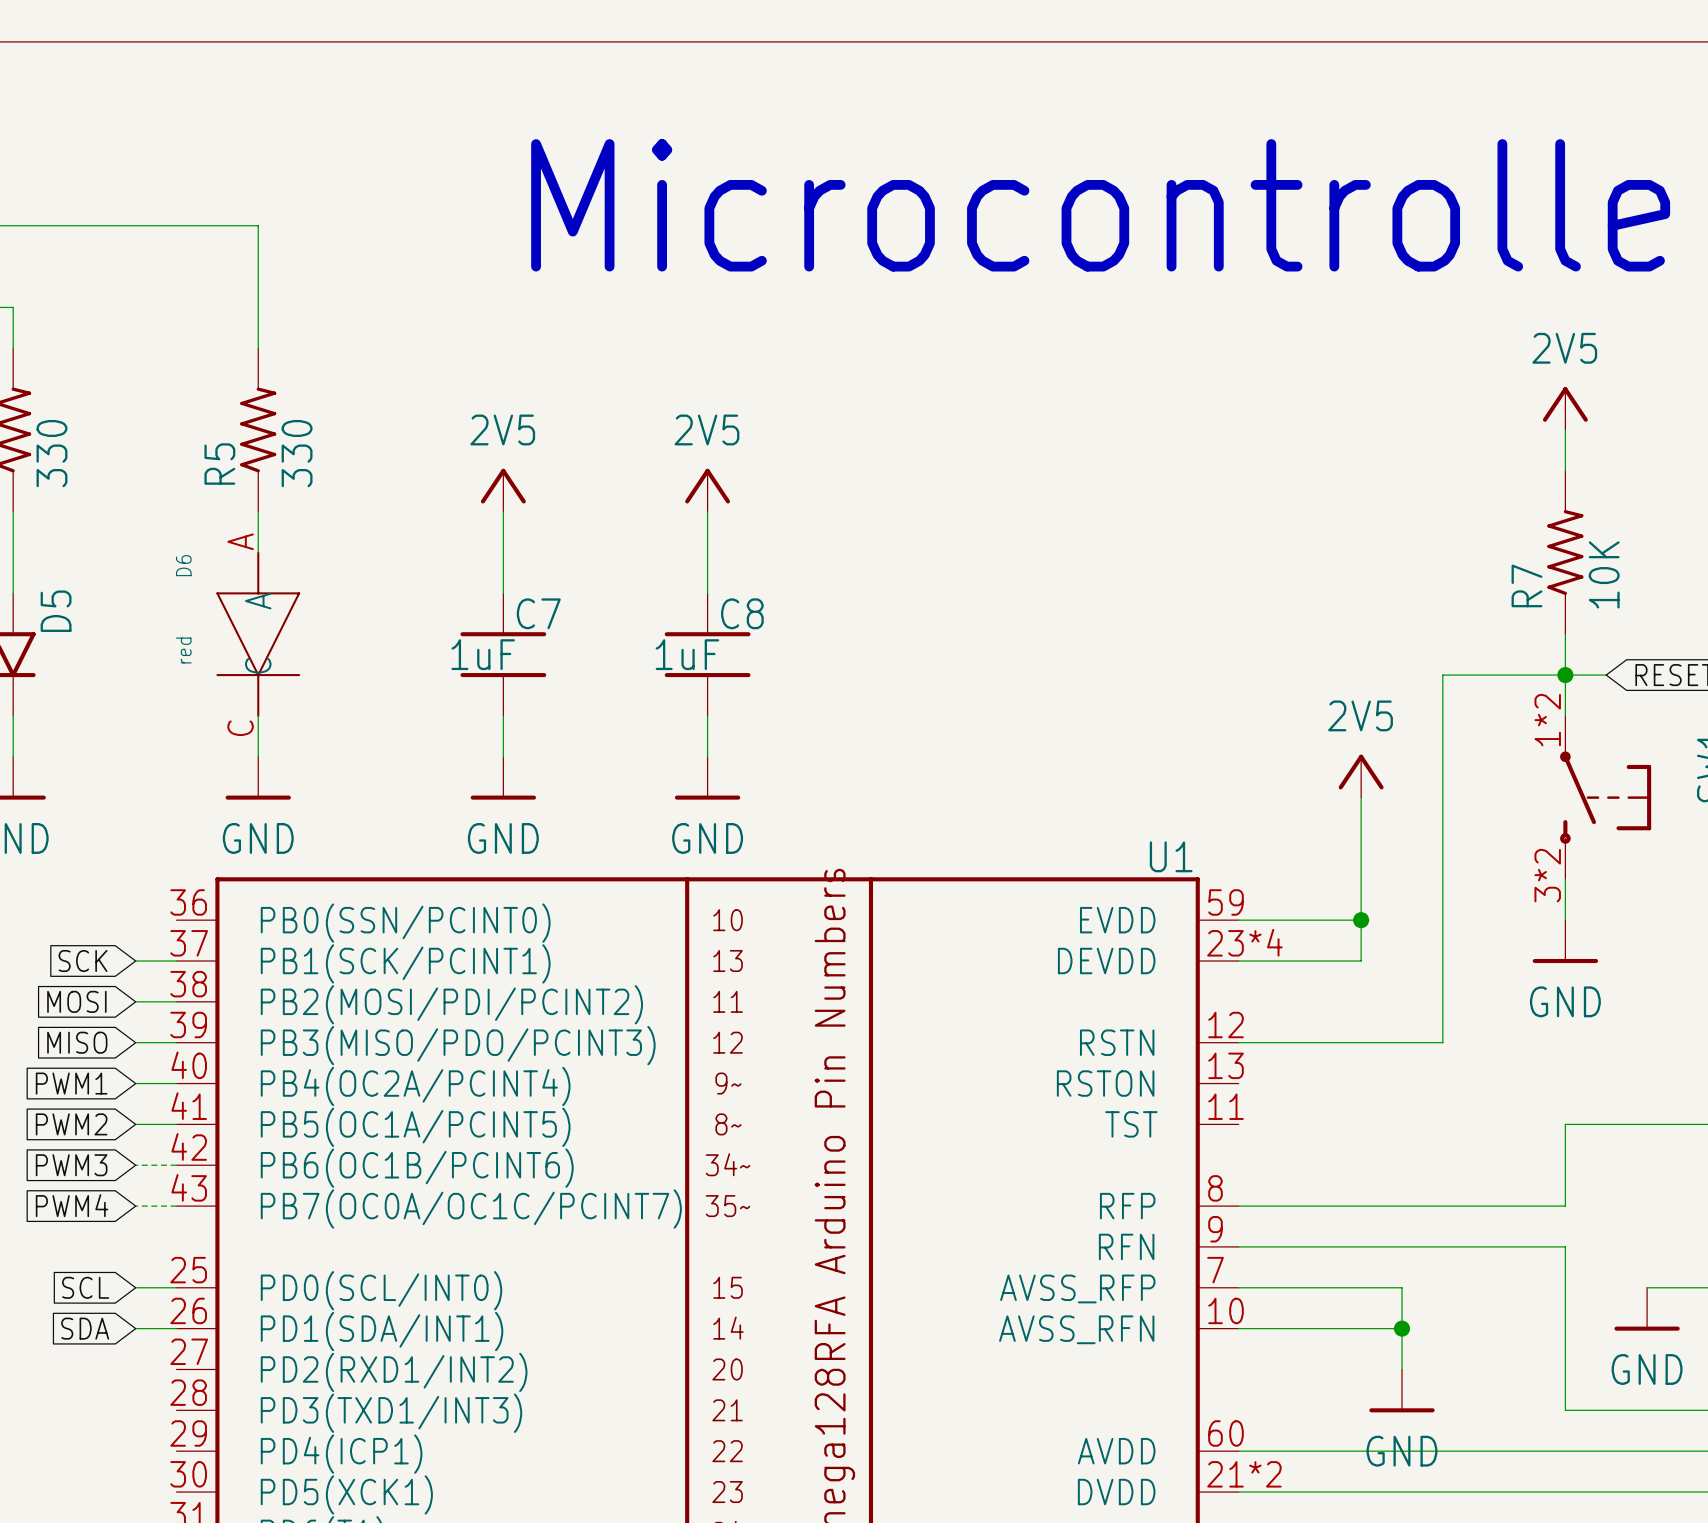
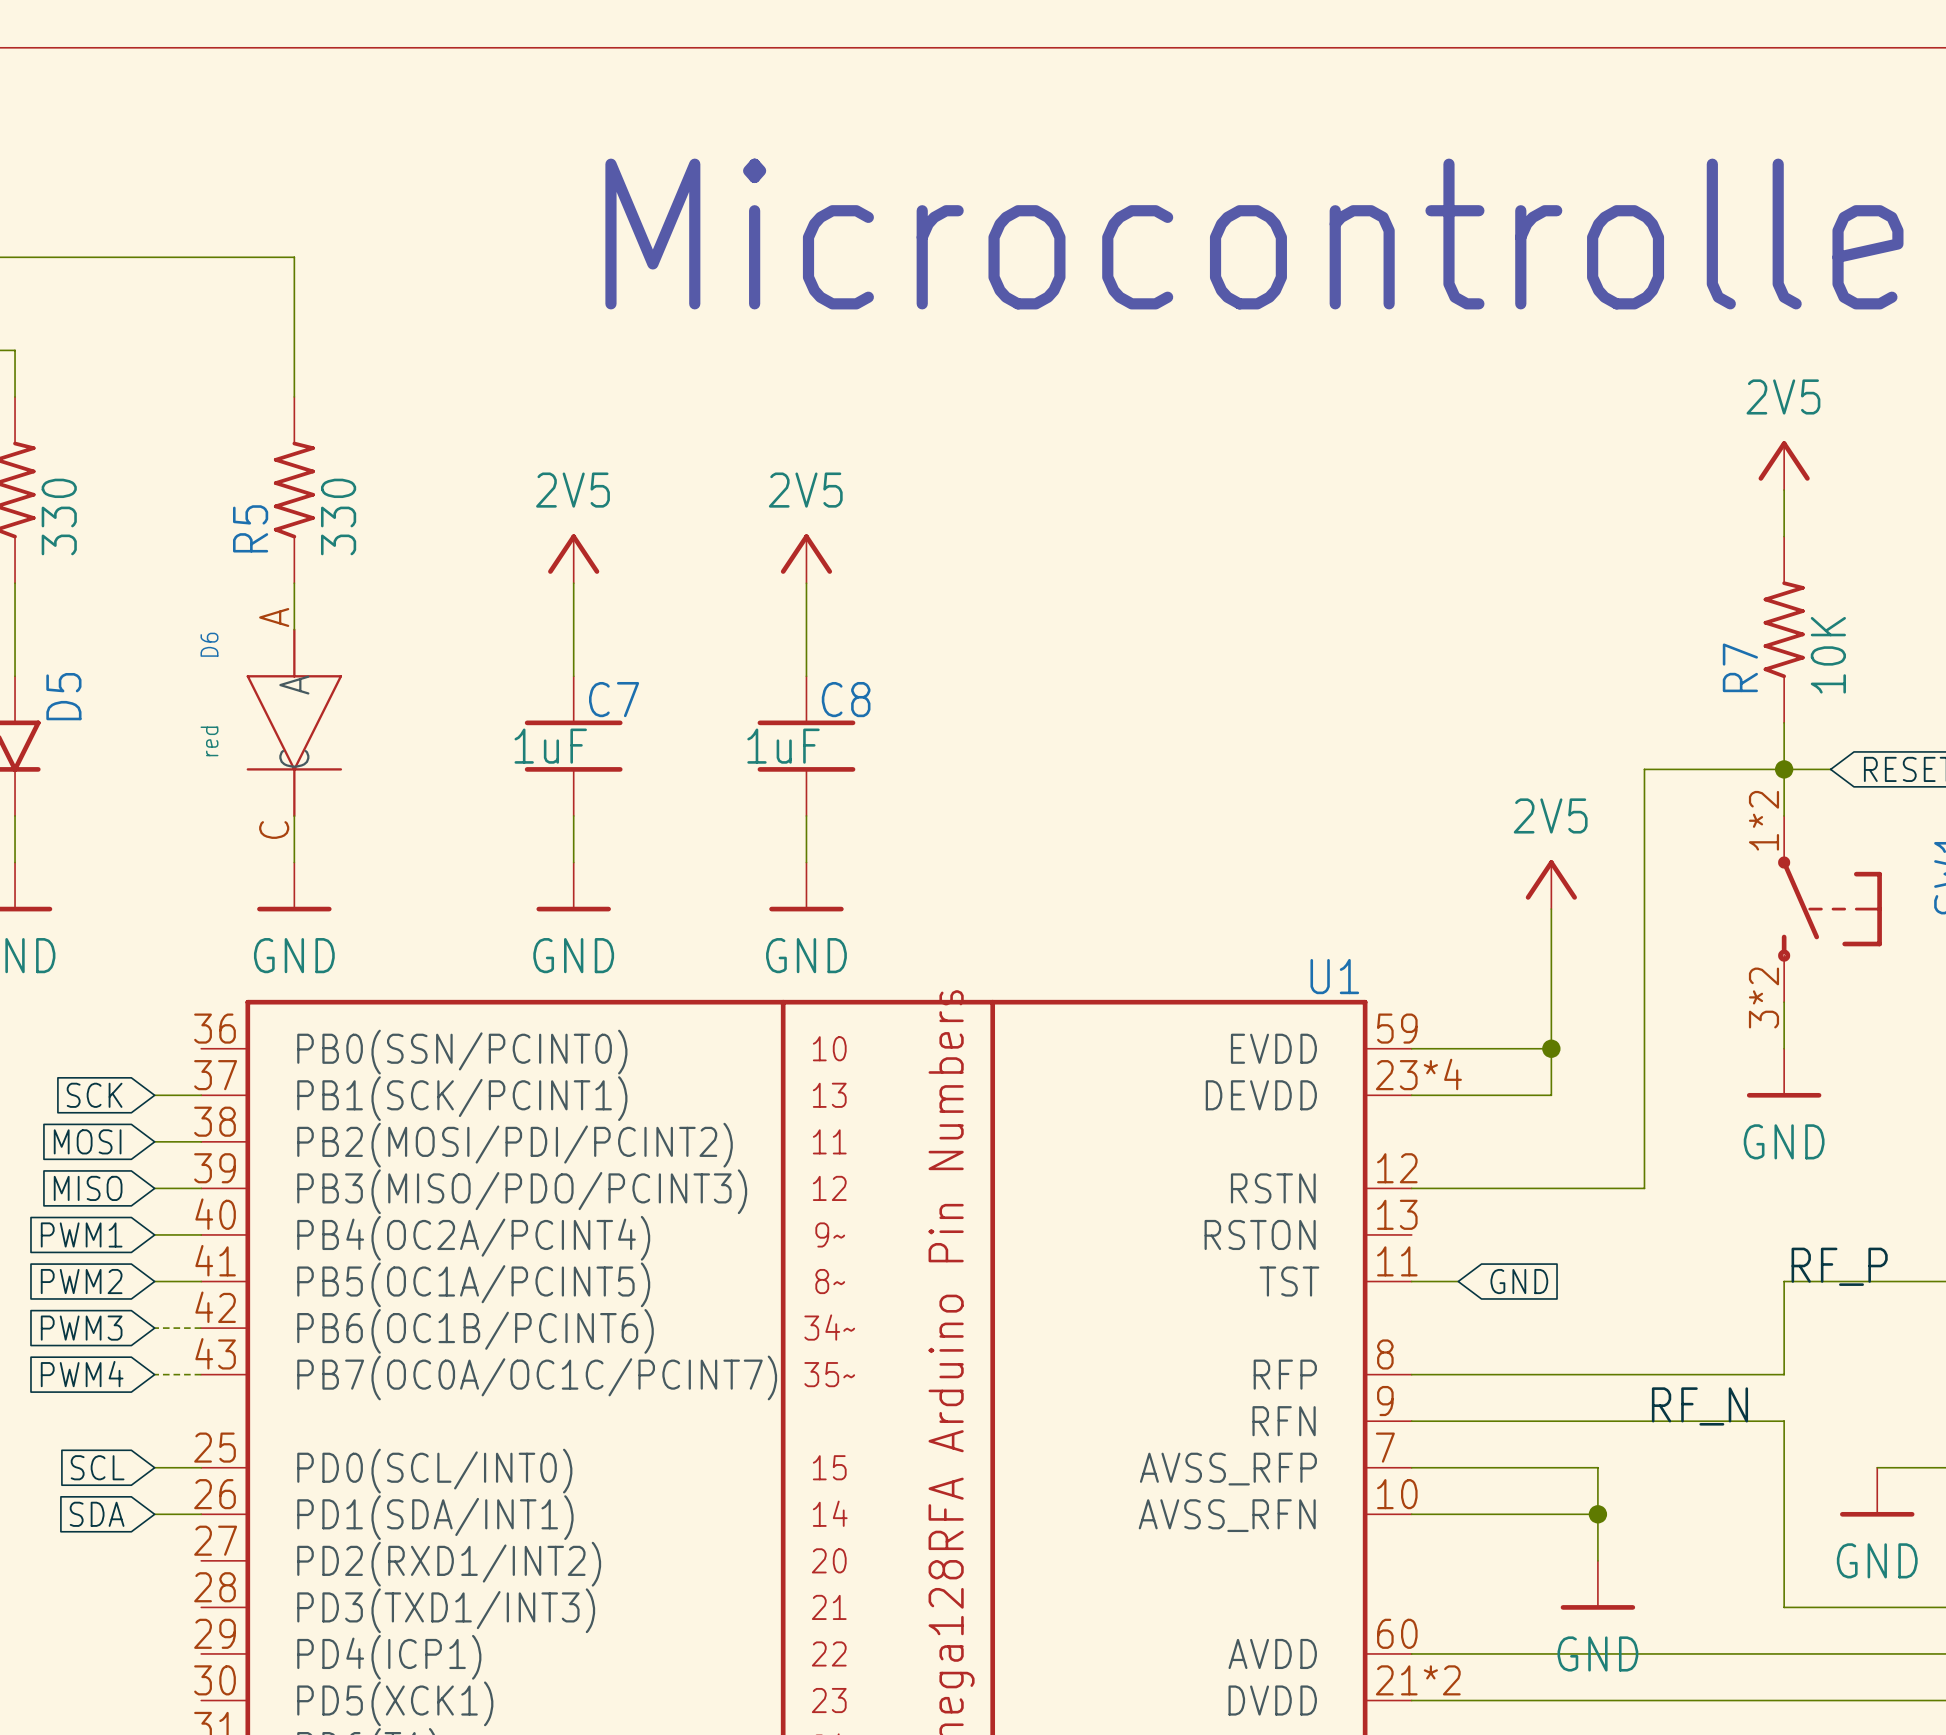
label: none -> RF_P (1839, 1266)
wire: none -> (1411, 1281) (1458, 1281)
global label: none -> GND (1519, 1281)
label: none -> RF_N (1699, 1406)

